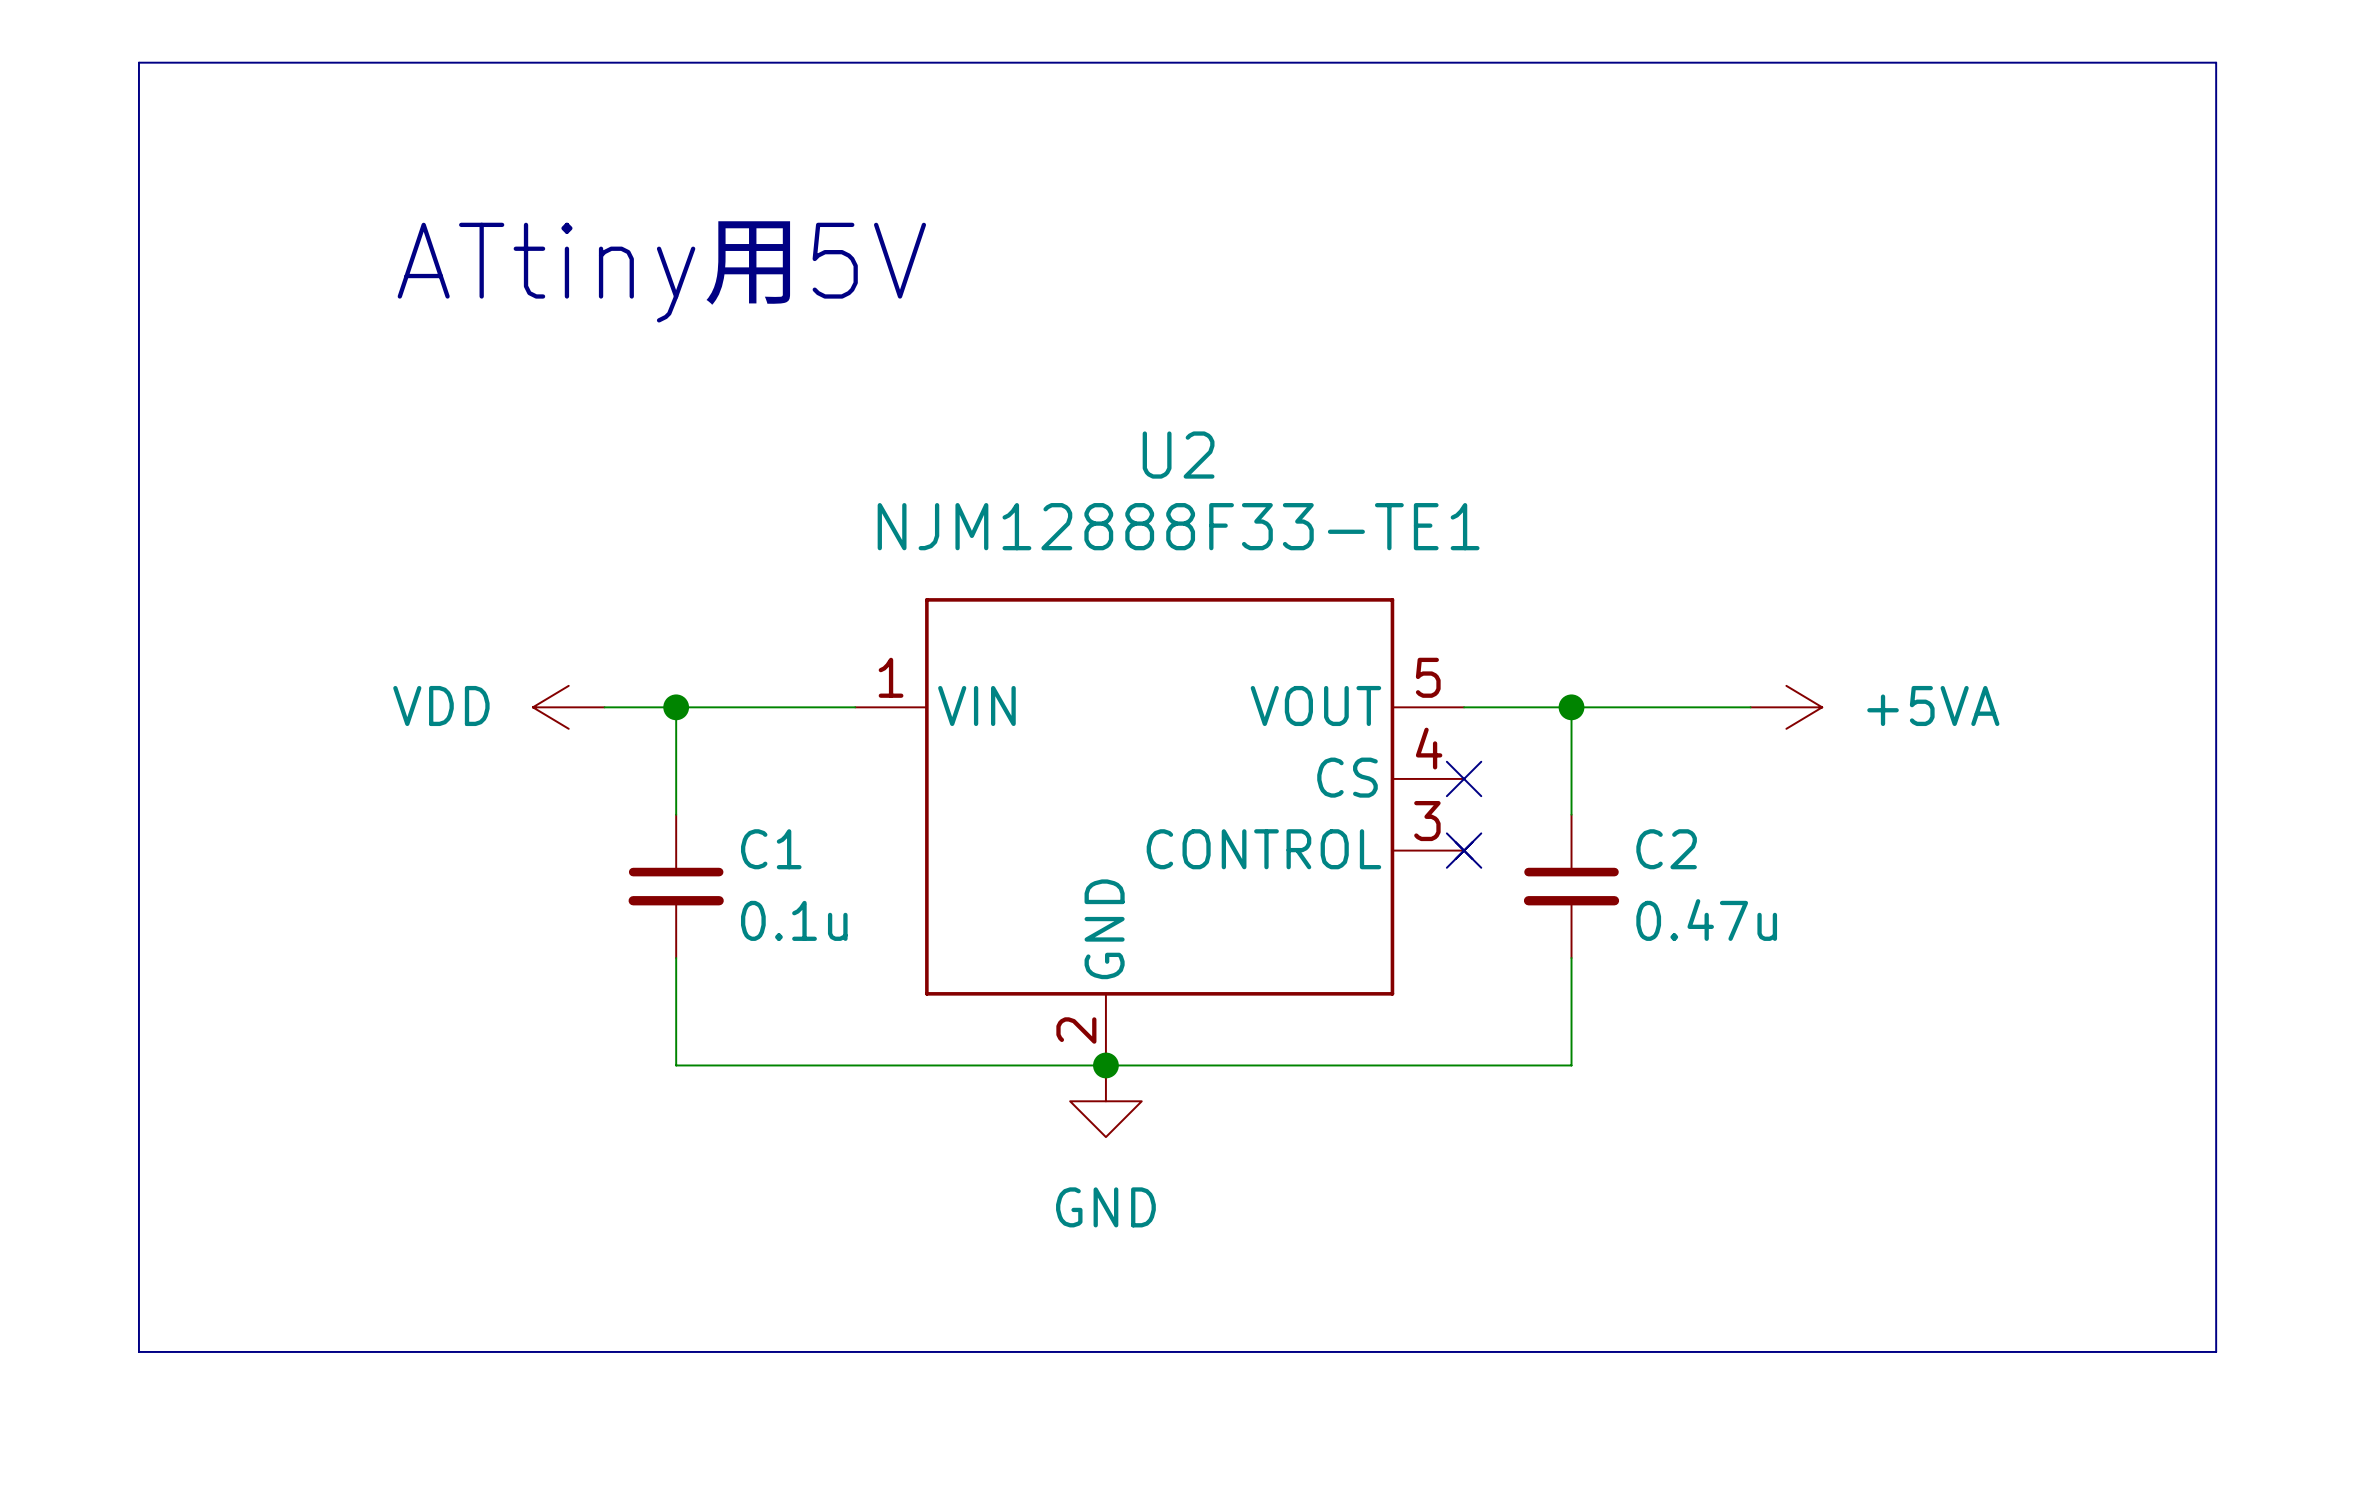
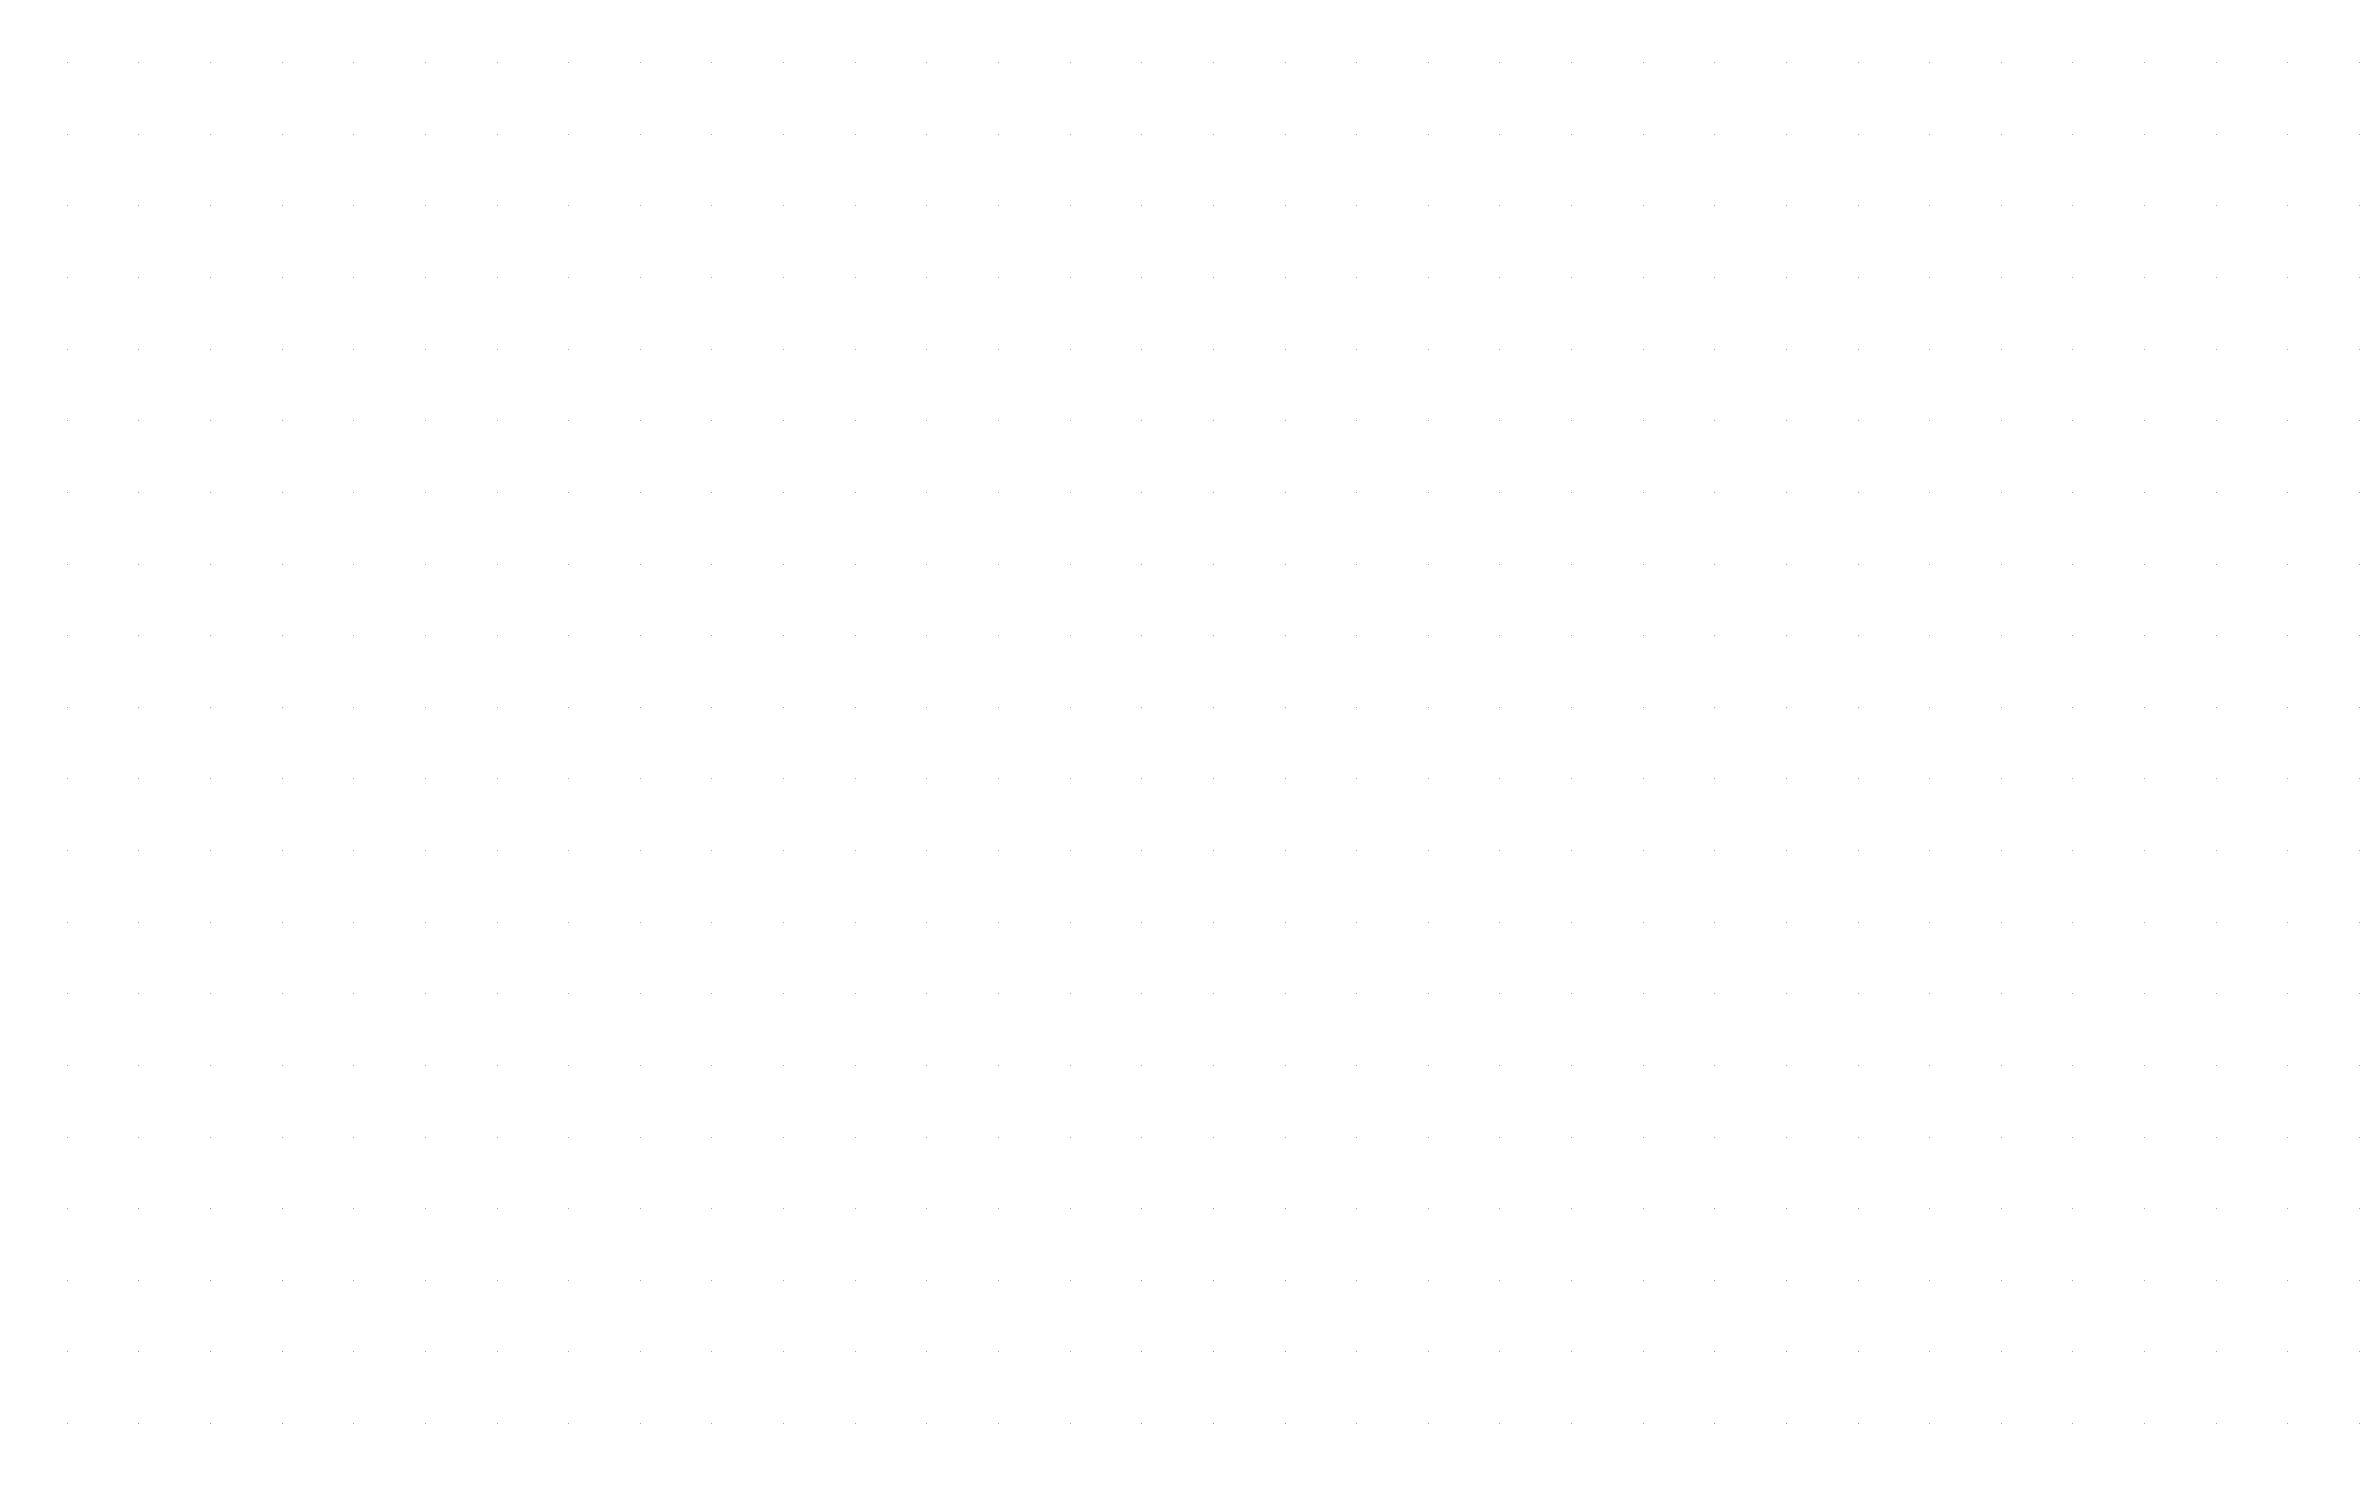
line: (138, 62) (2216, 62) (2216, 1351) (138, 1351) (138, 62) -> none
text: ATtiny用5V (661, 270) -> none
power symbol: VDD (568, 707) -> none
wire: (604, 707) (855, 707) -> none
wire: (676, 707) (676, 814) -> none
junction: (676, 707) -> none
wire: (1464, 707) (1750, 707) -> none
wire: (1571, 707) (1571, 814) -> none
junction: (1571, 707) -> none
power symbol: +5VA (1786, 707) -> none
no-connect mark: (1464, 778) -> none
U2: NJM12888F33-TE1 (1163, 831) -> none
no-connect mark: (1464, 850) -> none
C1: 0.1u (676, 886) -> none
C2: 0.47u (1571, 886) -> none
wire: (676, 958) (676, 1065) (1571, 1065) (1571, 958) -> none
junction: (1105, 1065) -> none
power symbol: GND (1105, 1101) -> none

